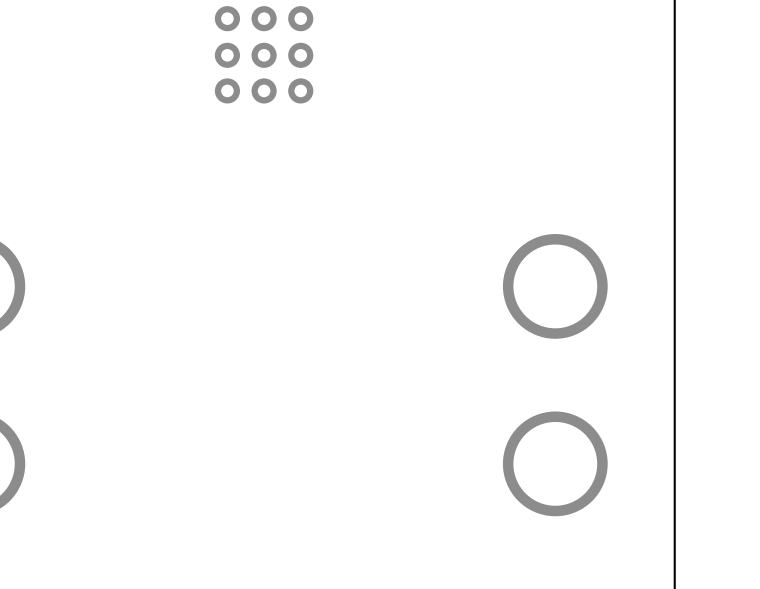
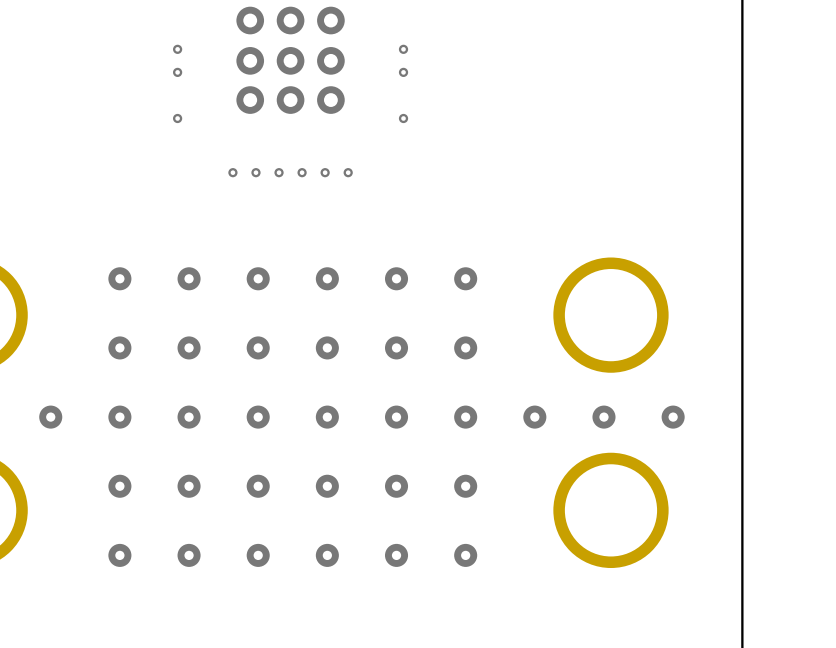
via: none -> (177, 49)
via: none -> (403, 49)
via: none -> (177, 72)
via: none -> (403, 72)
via: none -> (177, 118)
via: none -> (403, 118)
via: none -> (232, 172)
via: none -> (255, 172)
via: none -> (279, 172)
via: none -> (302, 172)
via: none -> (325, 172)
via: none -> (348, 172)
via: none -> (119, 278)
via: none -> (189, 278)
via: none -> (258, 278)
via: none -> (327, 278)
via: none -> (396, 278)
via: none -> (465, 278)
via: none -> (119, 347)
via: none -> (189, 347)
via: none -> (258, 347)
via: none -> (327, 347)
via: none -> (396, 347)
via: none -> (465, 347)
via: none -> (50, 417)
via: none -> (119, 417)
via: none -> (189, 417)
via: none -> (258, 417)
via: none -> (327, 417)
via: none -> (396, 417)
via: none -> (465, 417)
via: none -> (534, 417)
via: none -> (603, 417)
via: none -> (673, 417)
via: none -> (119, 486)
via: none -> (189, 486)
via: none -> (258, 486)
via: none -> (327, 486)
via: none -> (396, 486)
via: none -> (465, 486)
via: none -> (119, 555)
via: none -> (189, 555)
via: none -> (258, 555)
via: none -> (327, 555)
via: none -> (396, 555)
via: none -> (465, 555)

